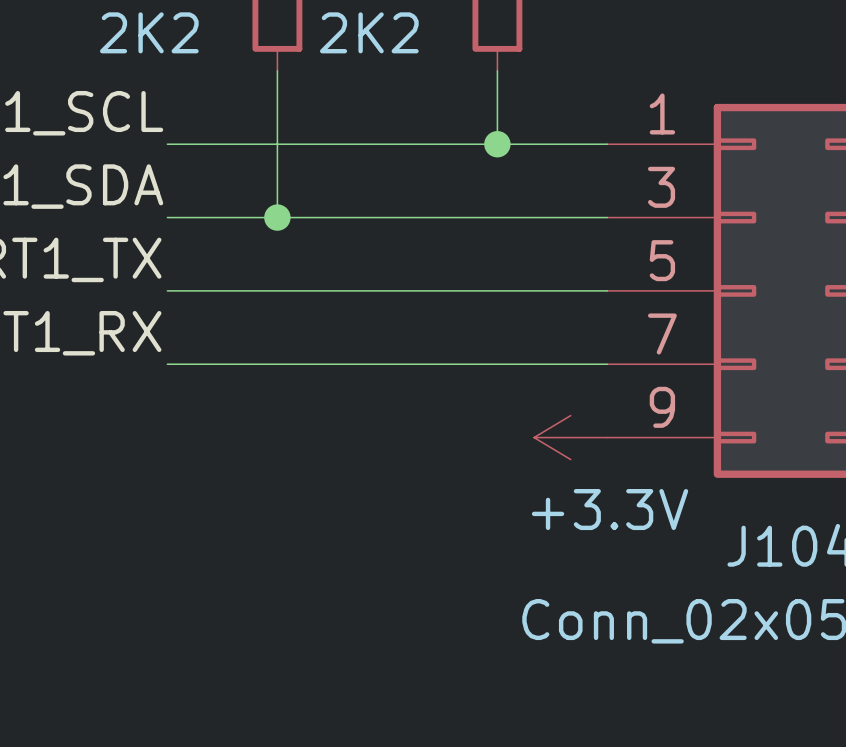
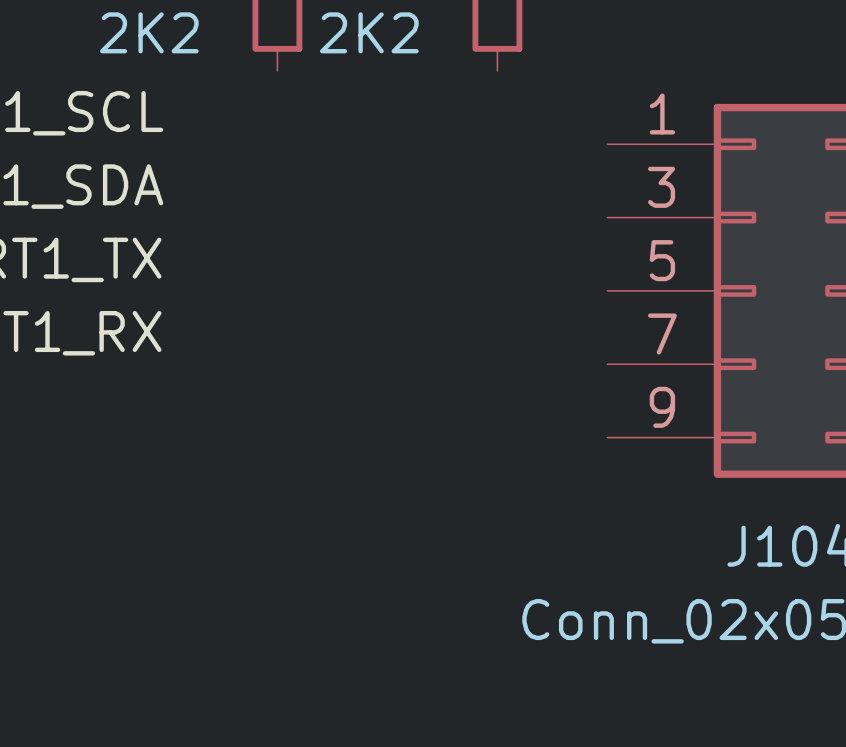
wire: (277, 70) (277, 217) -> none
wire: (497, 70) (497, 144) -> none
wire: (167, 144) (607, 144) -> none
junction: (497, 144) -> none
wire: (167, 217) (607, 217) -> none
junction: (277, 217) -> none
wire: (167, 290) (607, 290) -> none
wire: (167, 364) (607, 364) -> none
power symbol: +3.3V (570, 437) -> none

